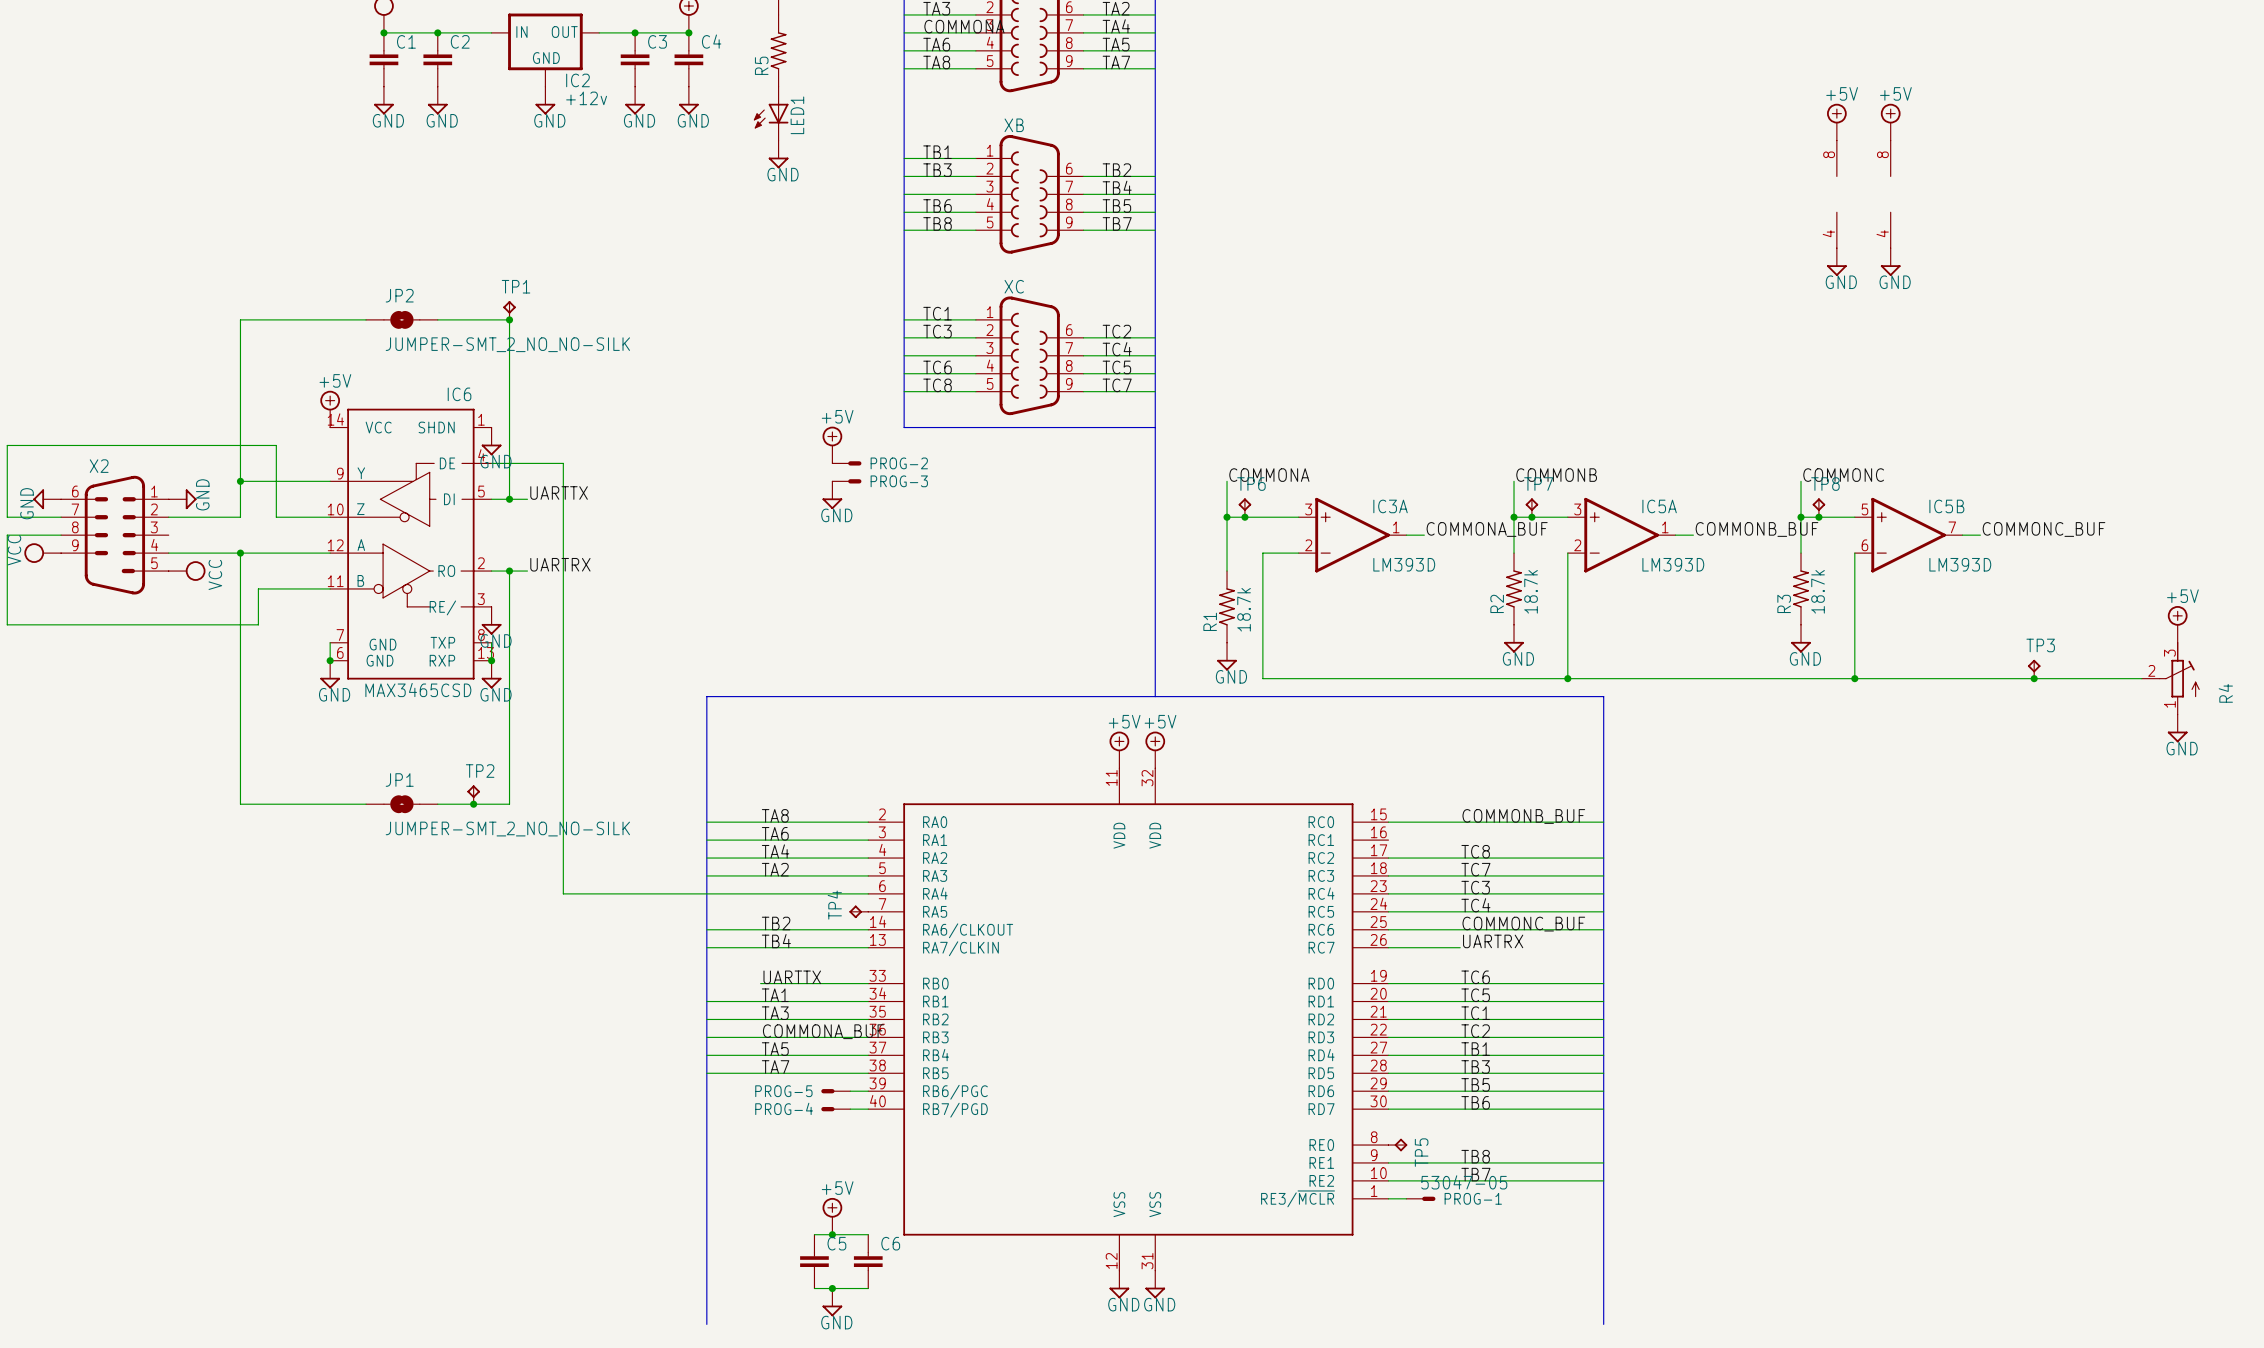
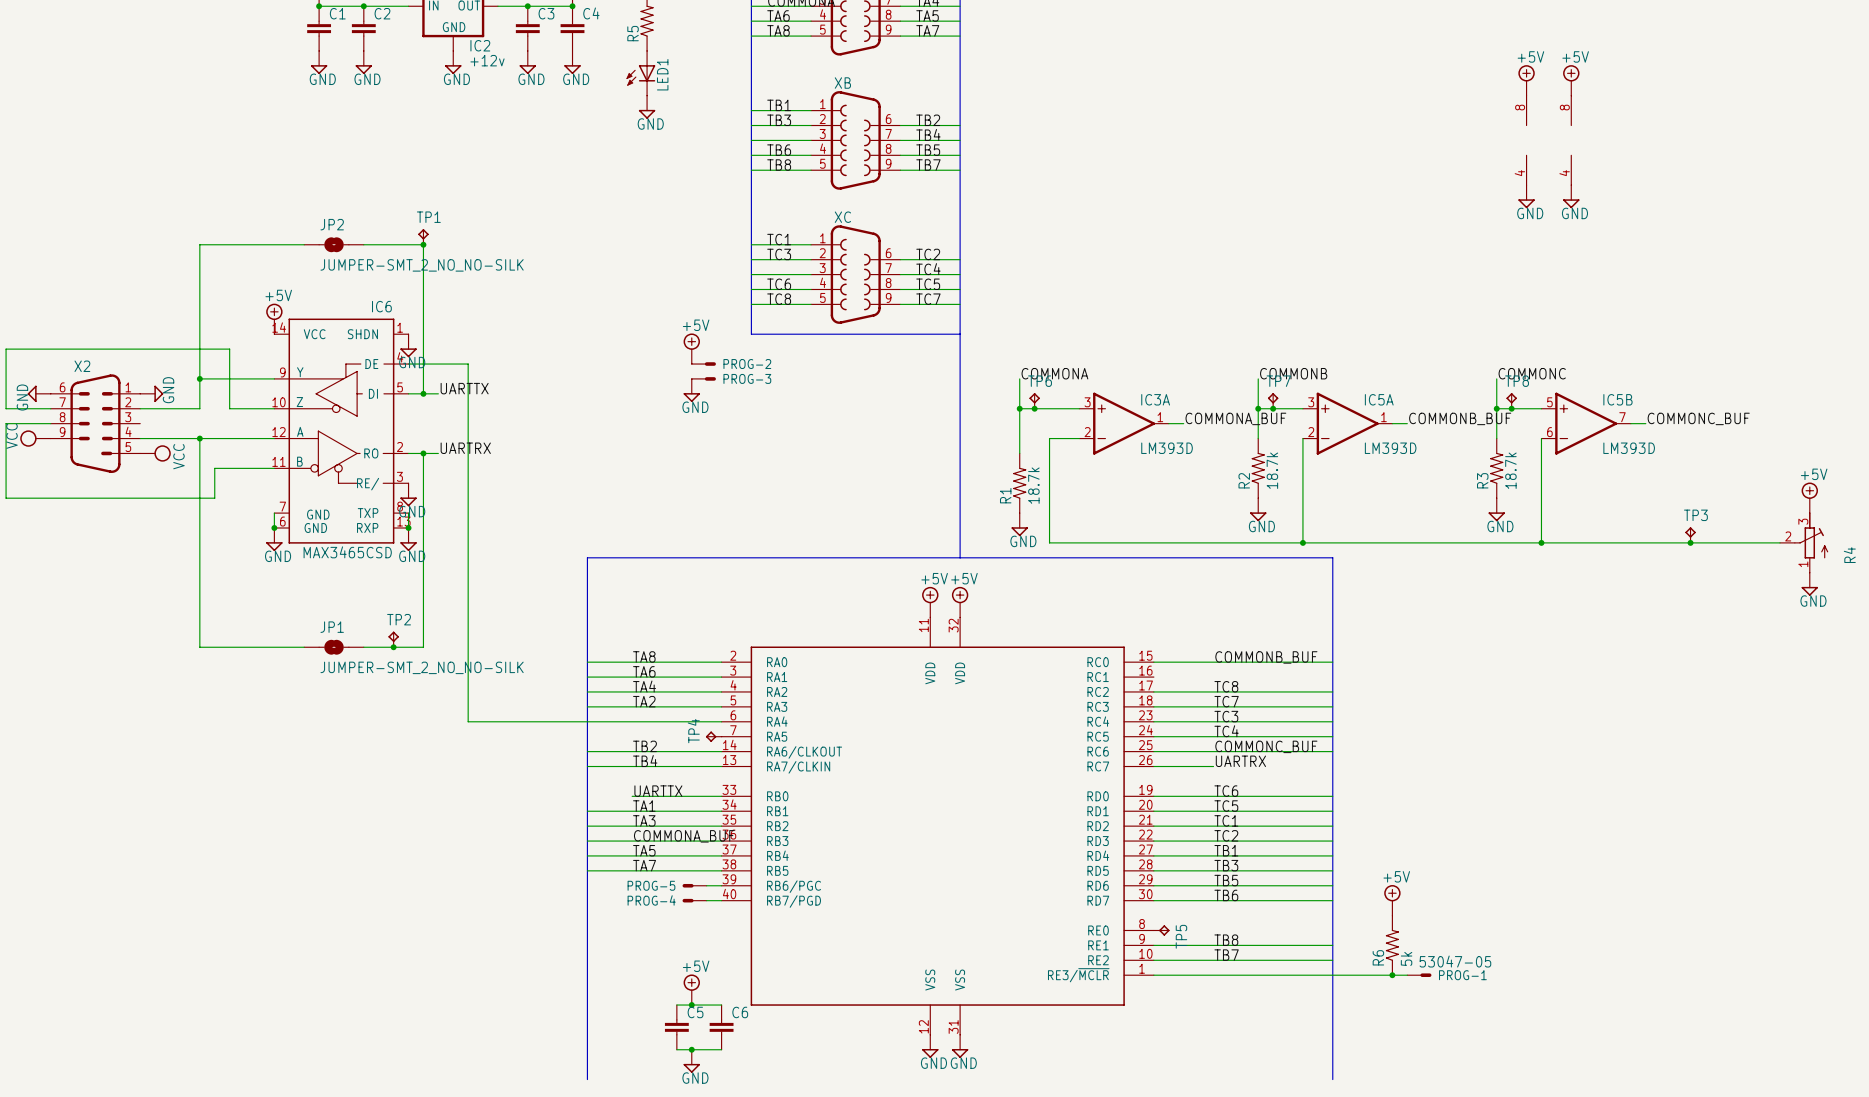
power symbol: none -> +5V (1392, 900)
R6: none -> 5k (1392, 945)
wire: none -> (1168, 975) (1407, 975)
PROG-1 position: (1420, 1198) -> (1419, 975)
junction: none -> (1392, 975)

